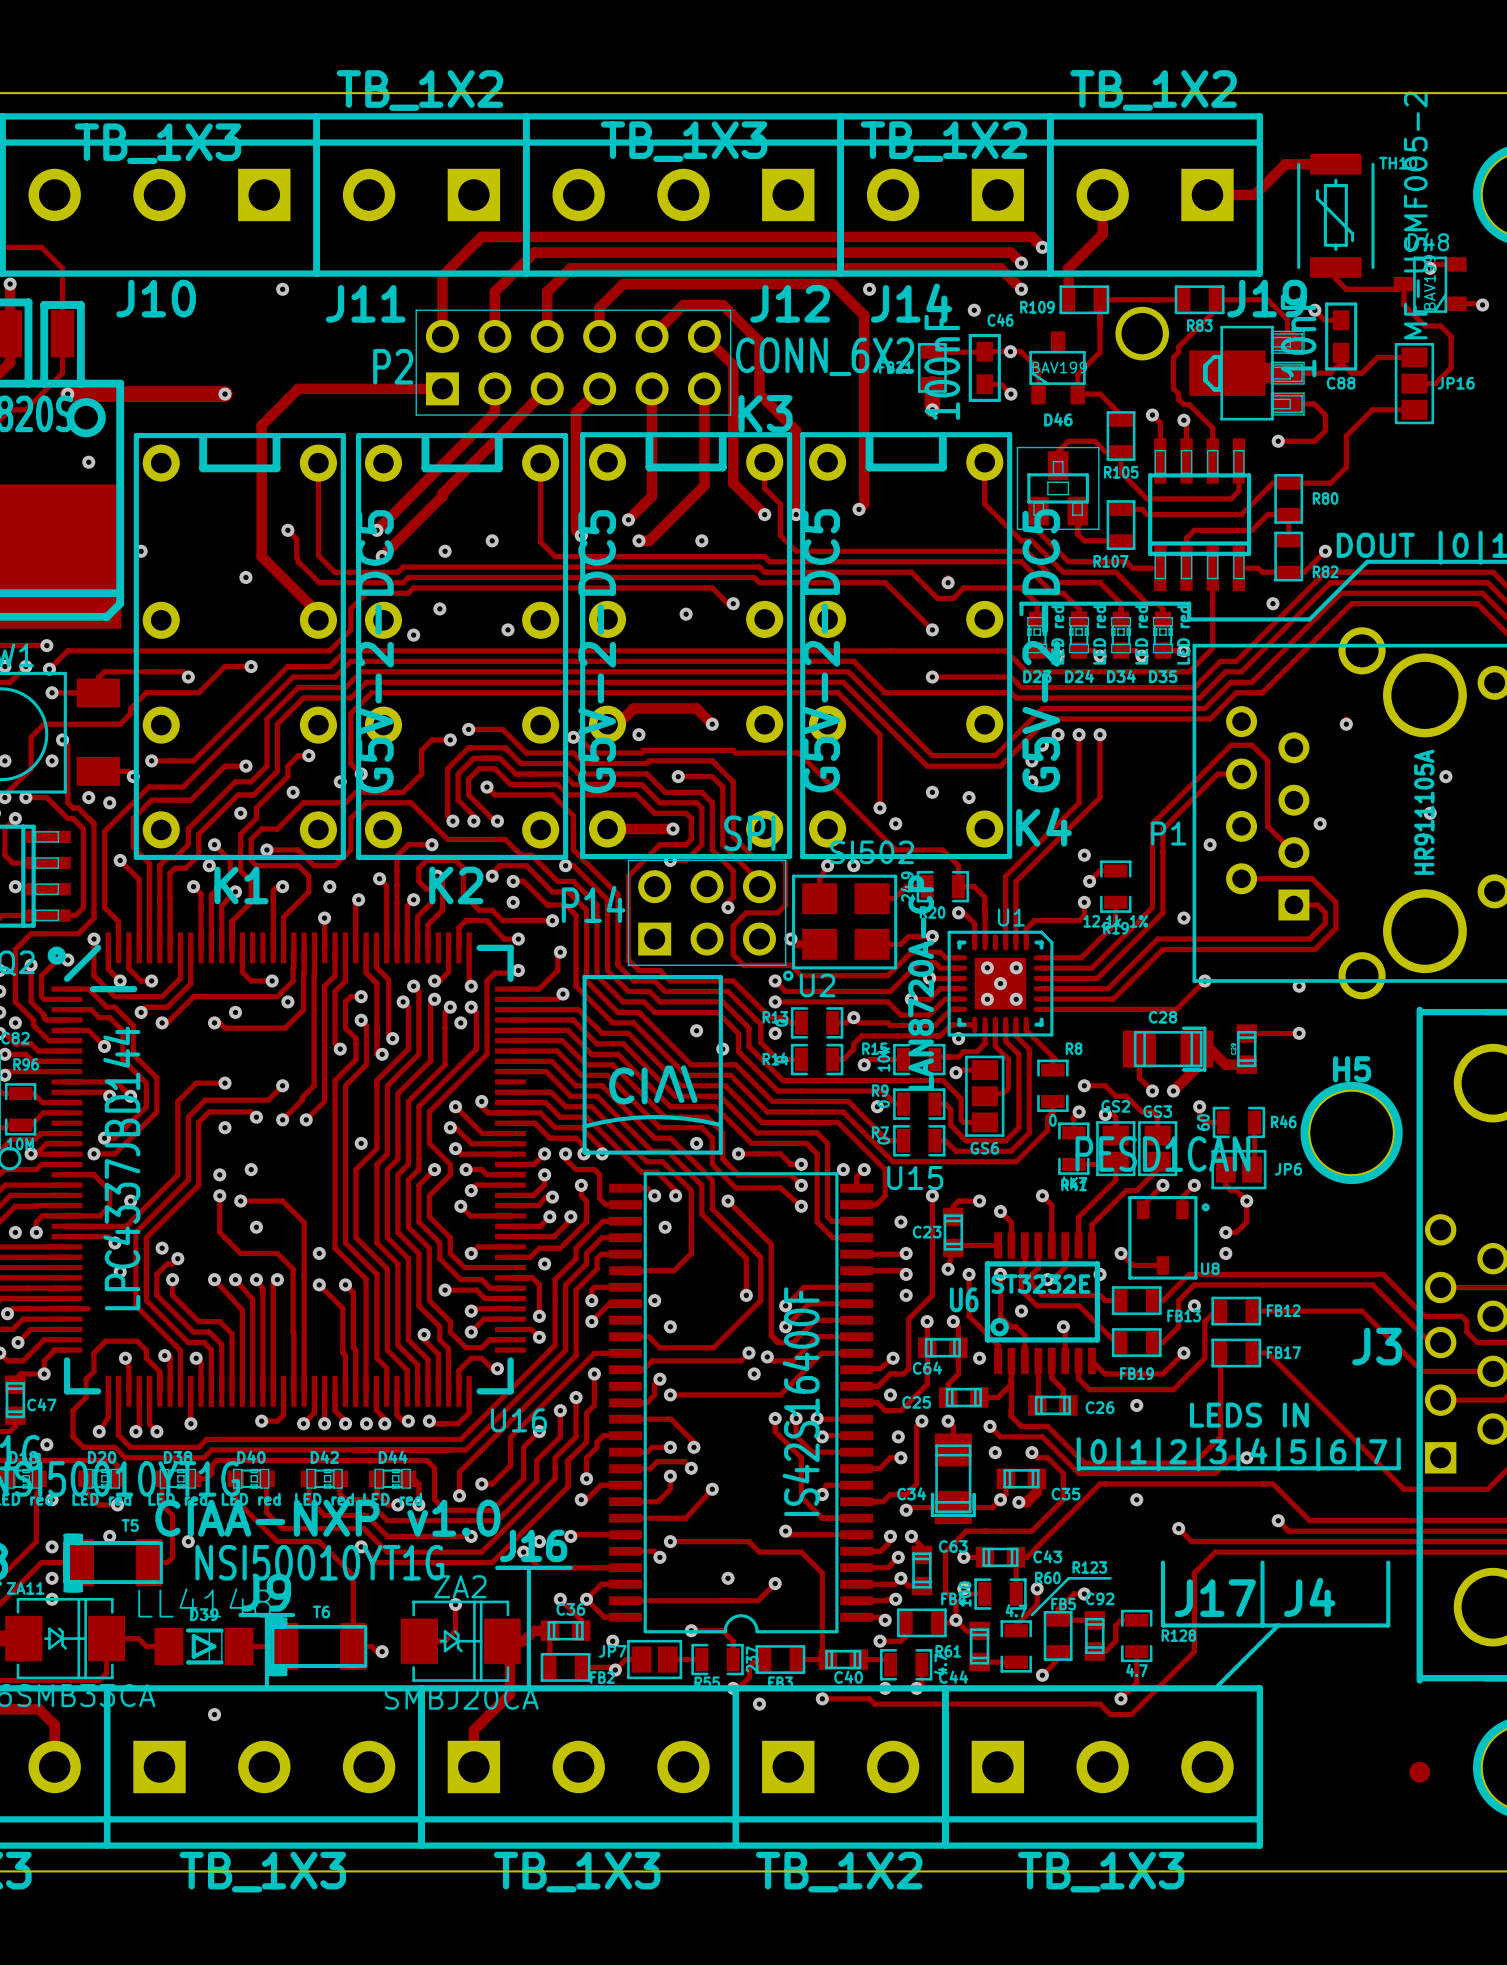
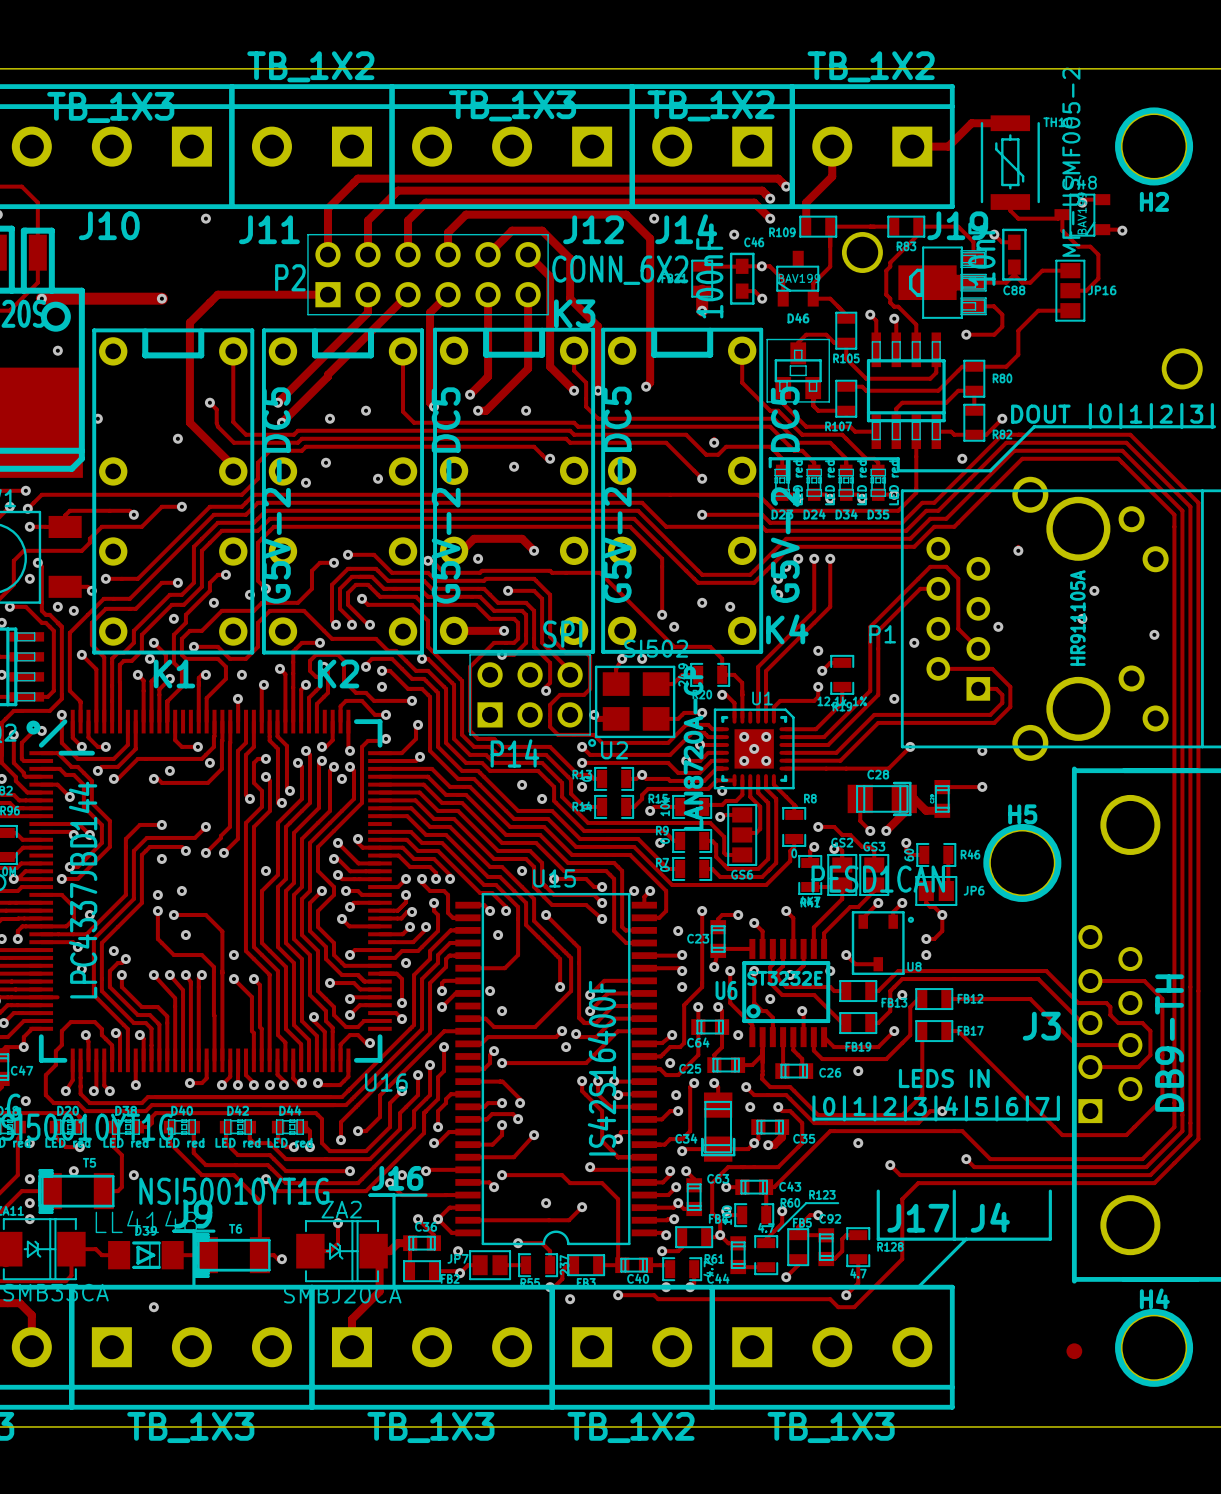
P14 name position: P14 (593, 904) -> P14 (514, 753)
line: (584, 977) (720, 977) (720, 1152) (584, 1152) (584, 977) -> none
line: (667, 1068) (656, 1100) -> none
line: (670, 1068) (681, 1100) -> none
line: (683, 1068) (694, 1100) -> none
text: CI (628, 1085) -> none
line: (718, 1124) (685, 1118) (651, 1117) (617, 1119) (584, 1126) -> none
U15 name position: U15 (915, 1178) -> U15 (554, 878)
text: CIAA-NXP v1.0 (327, 1518) -> none

